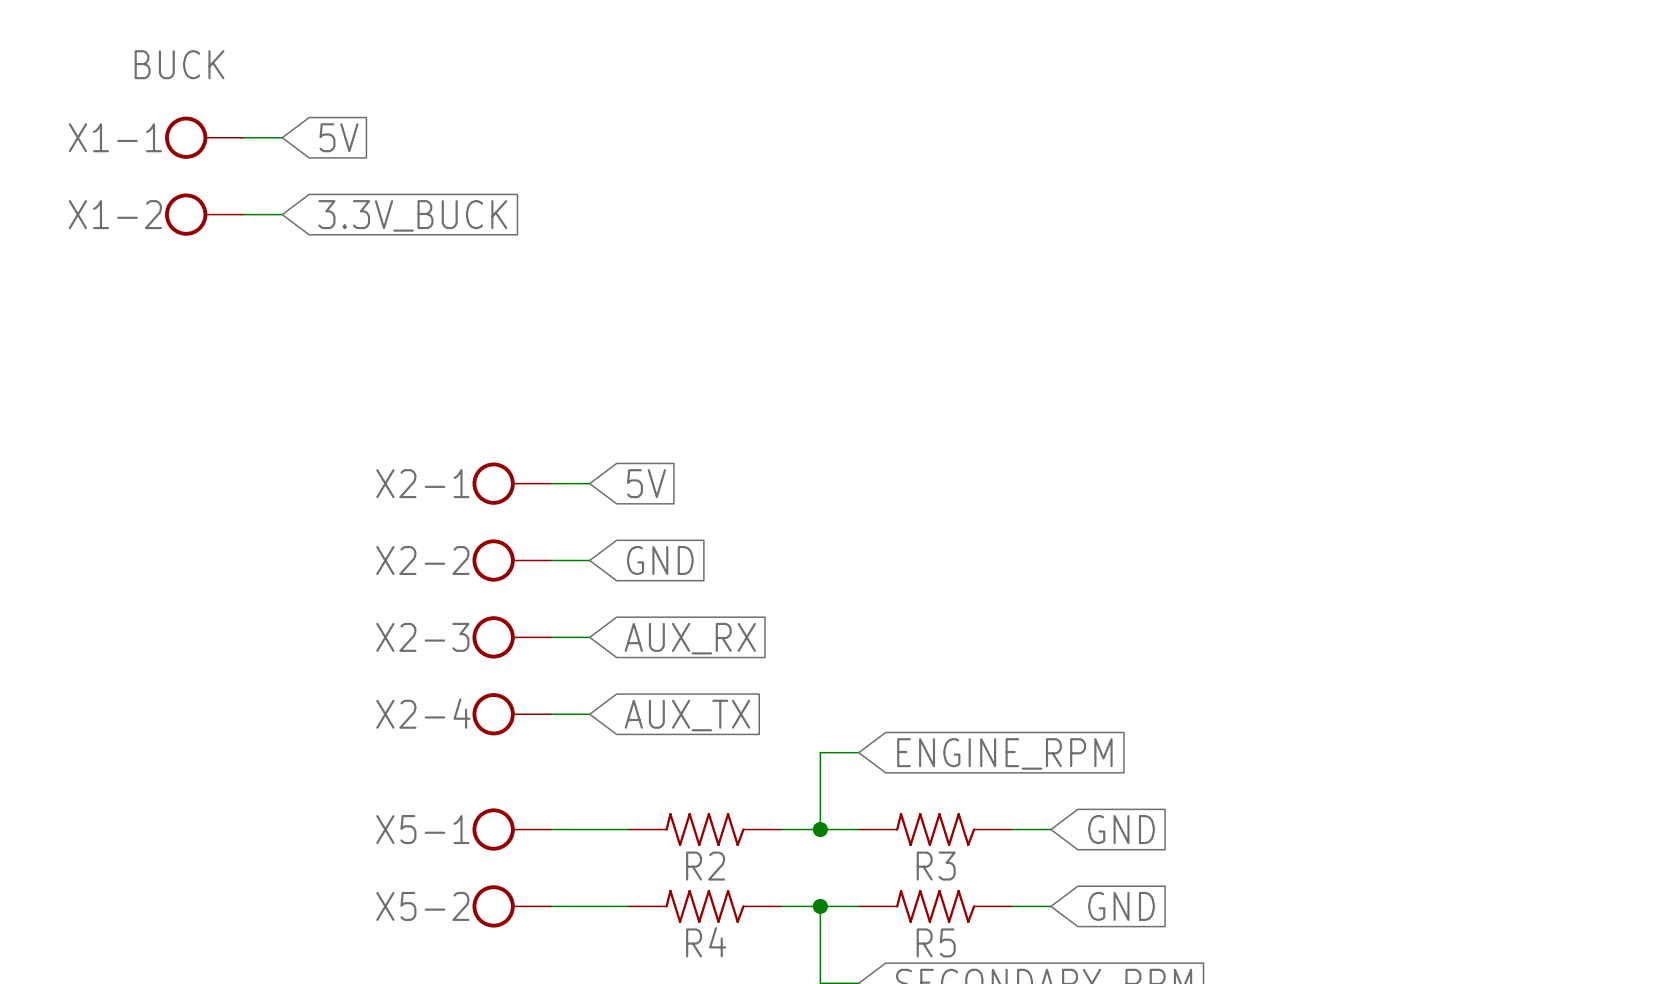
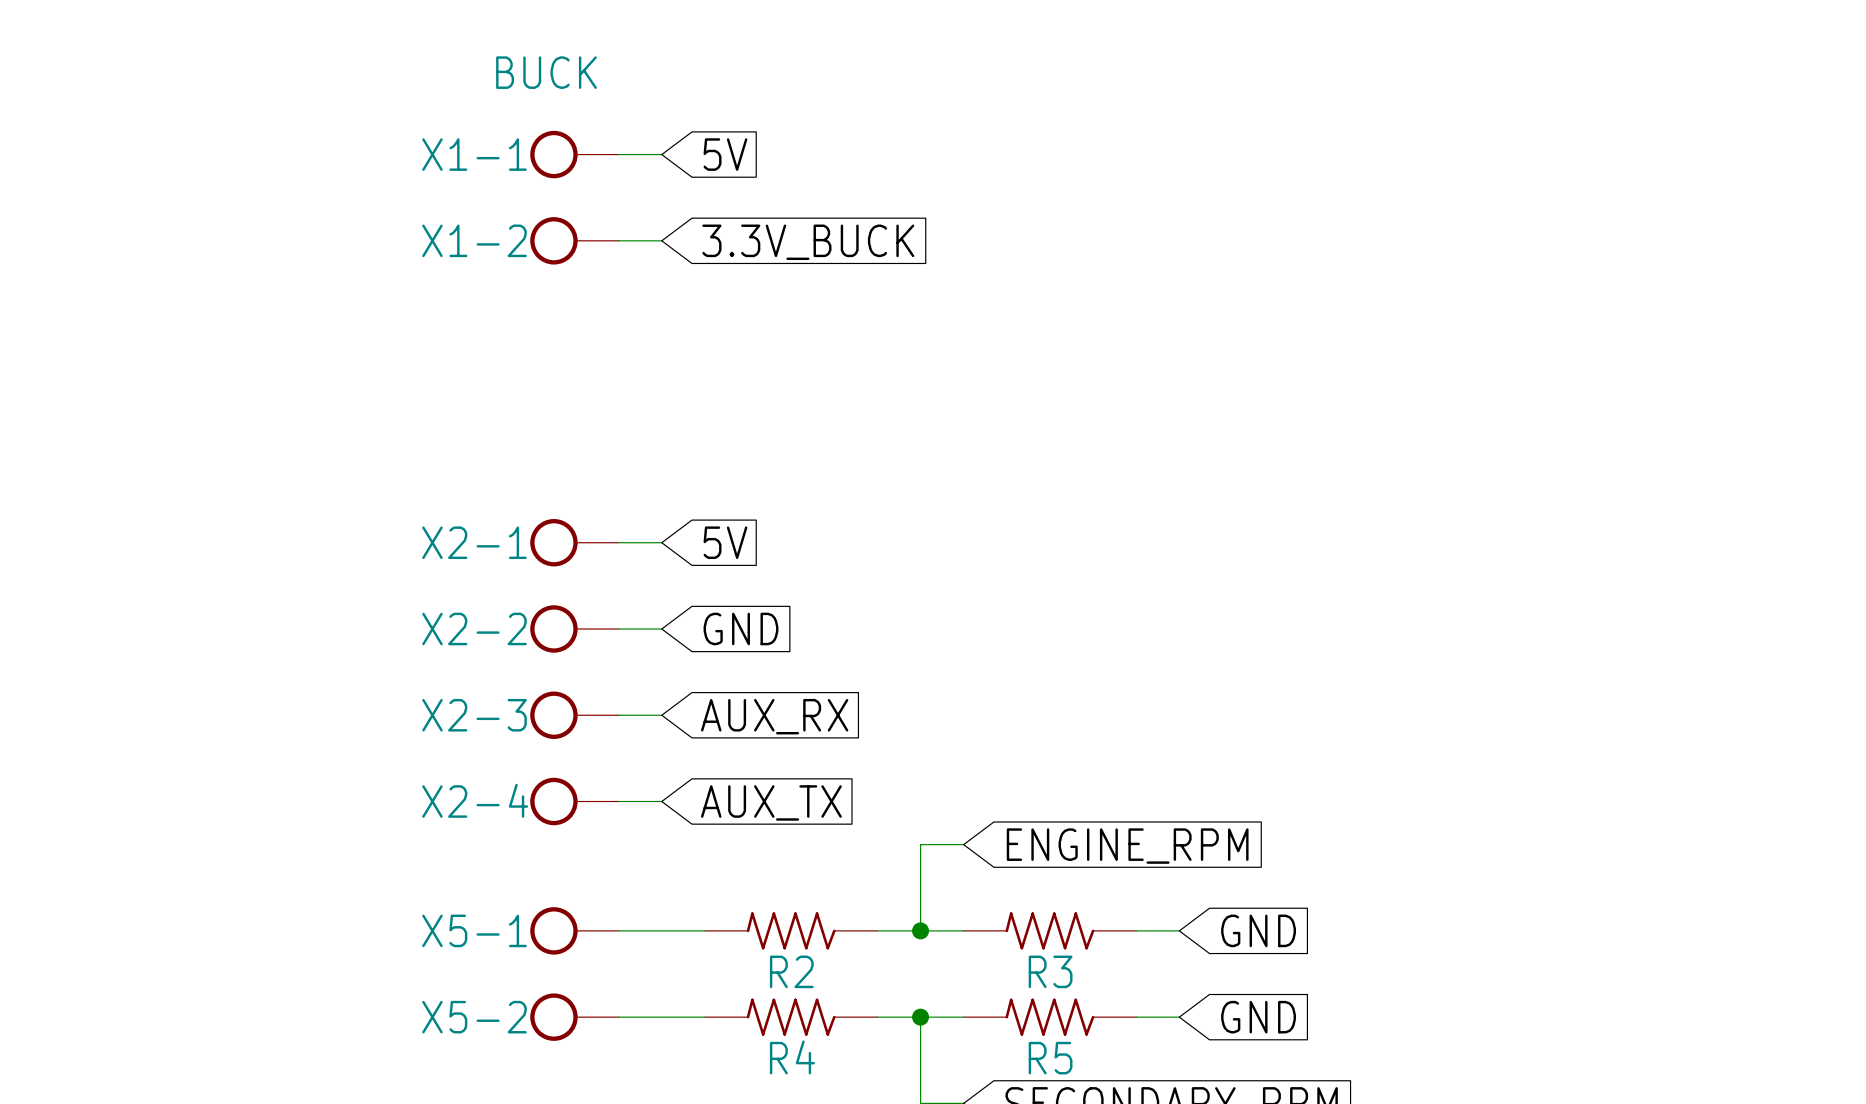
X1-1 position: (204, 137) -> (574, 154)
wire: (243, 137) (282, 137) -> (618, 154) (661, 154)
global label position: 5V (339, 137) -> 5V (725, 154)
X1-2 position: (204, 214) -> (574, 240)
wire: (243, 214) (282, 214) -> (618, 240) (661, 240)
global label position: 3.3V_BUCK (412, 215) -> 3.3V_BUCK (808, 242)

